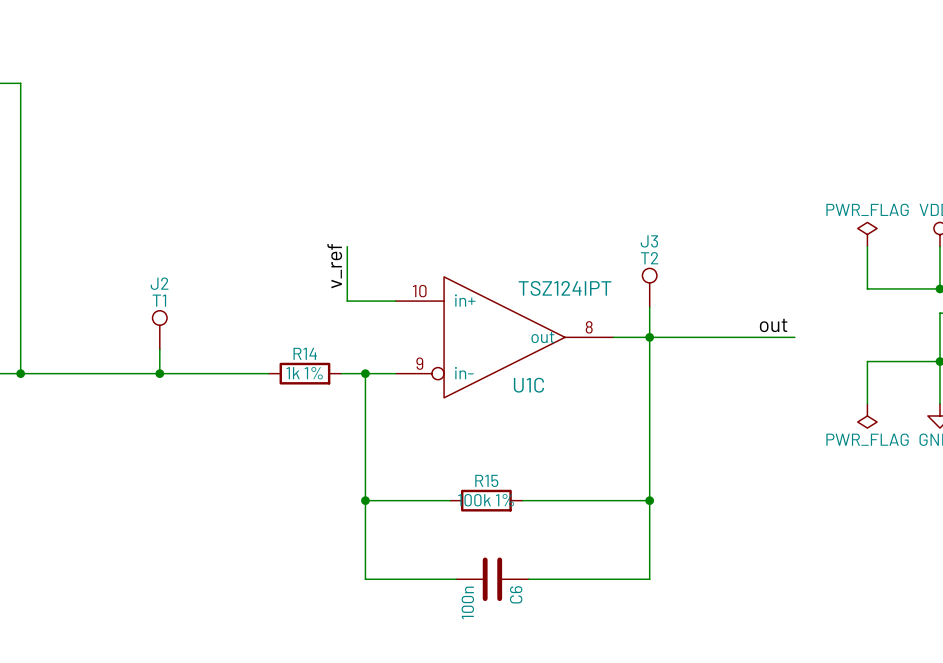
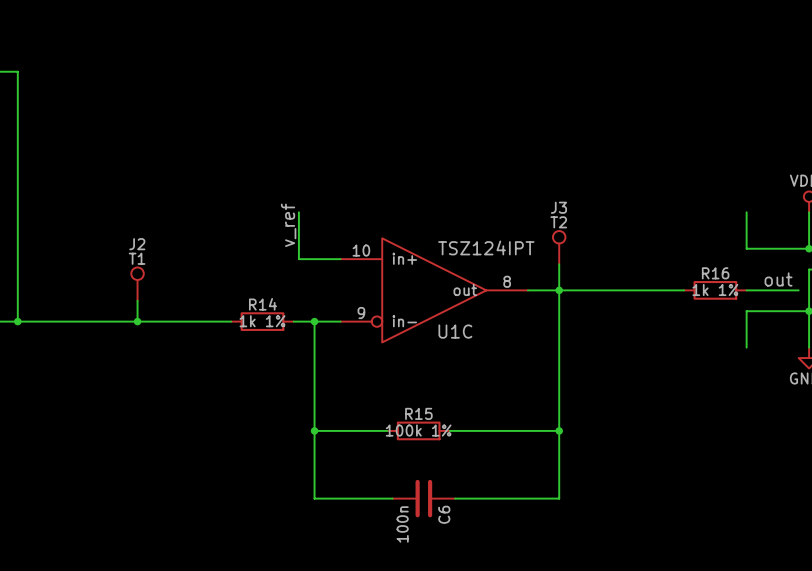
power symbol: PWR_FLAG (867, 234) -> none
label: out (773, 325) -> none
label: none -> out (778, 279)
R16: none -> 1k 1% (715, 290)
wire: none -> (746, 290) (798, 290)
power symbol: PWR_FLAG (867, 415) -> none

